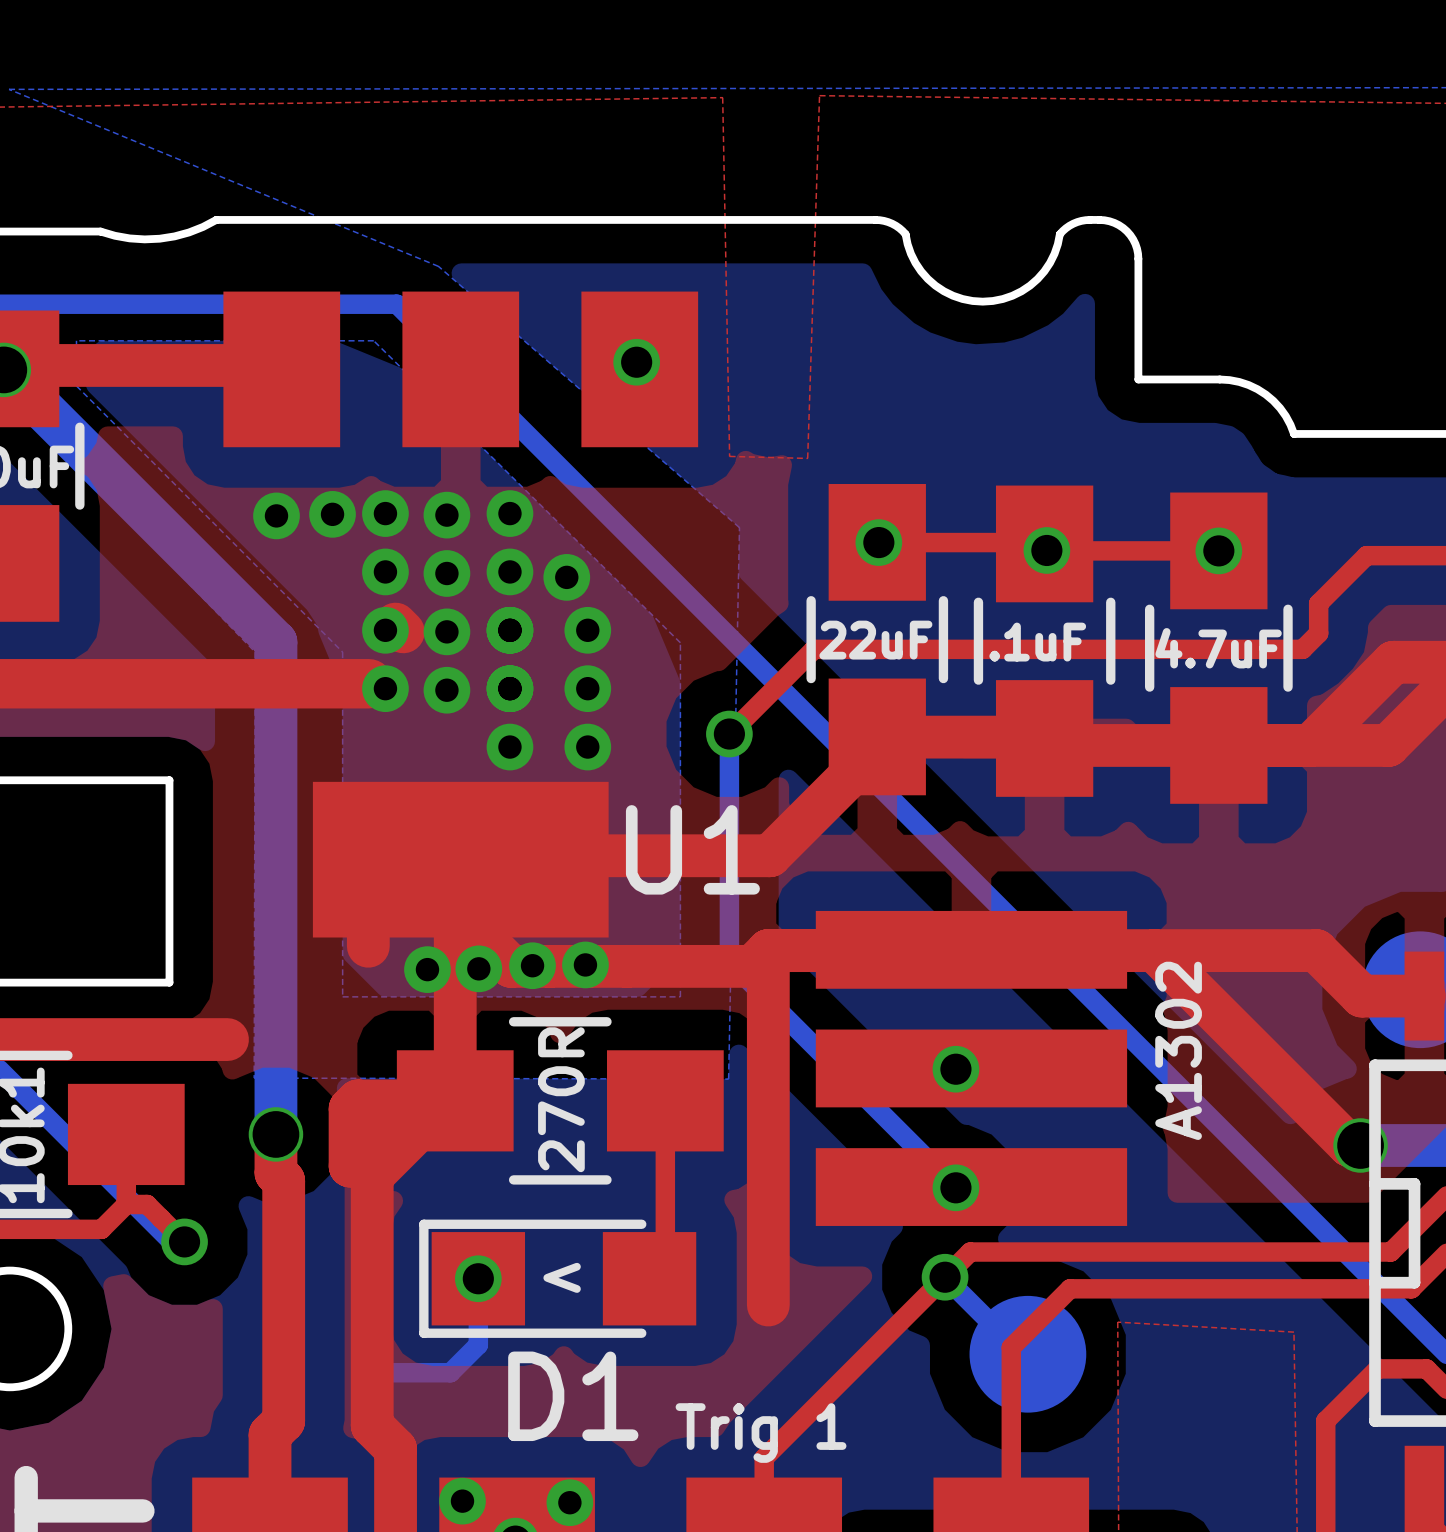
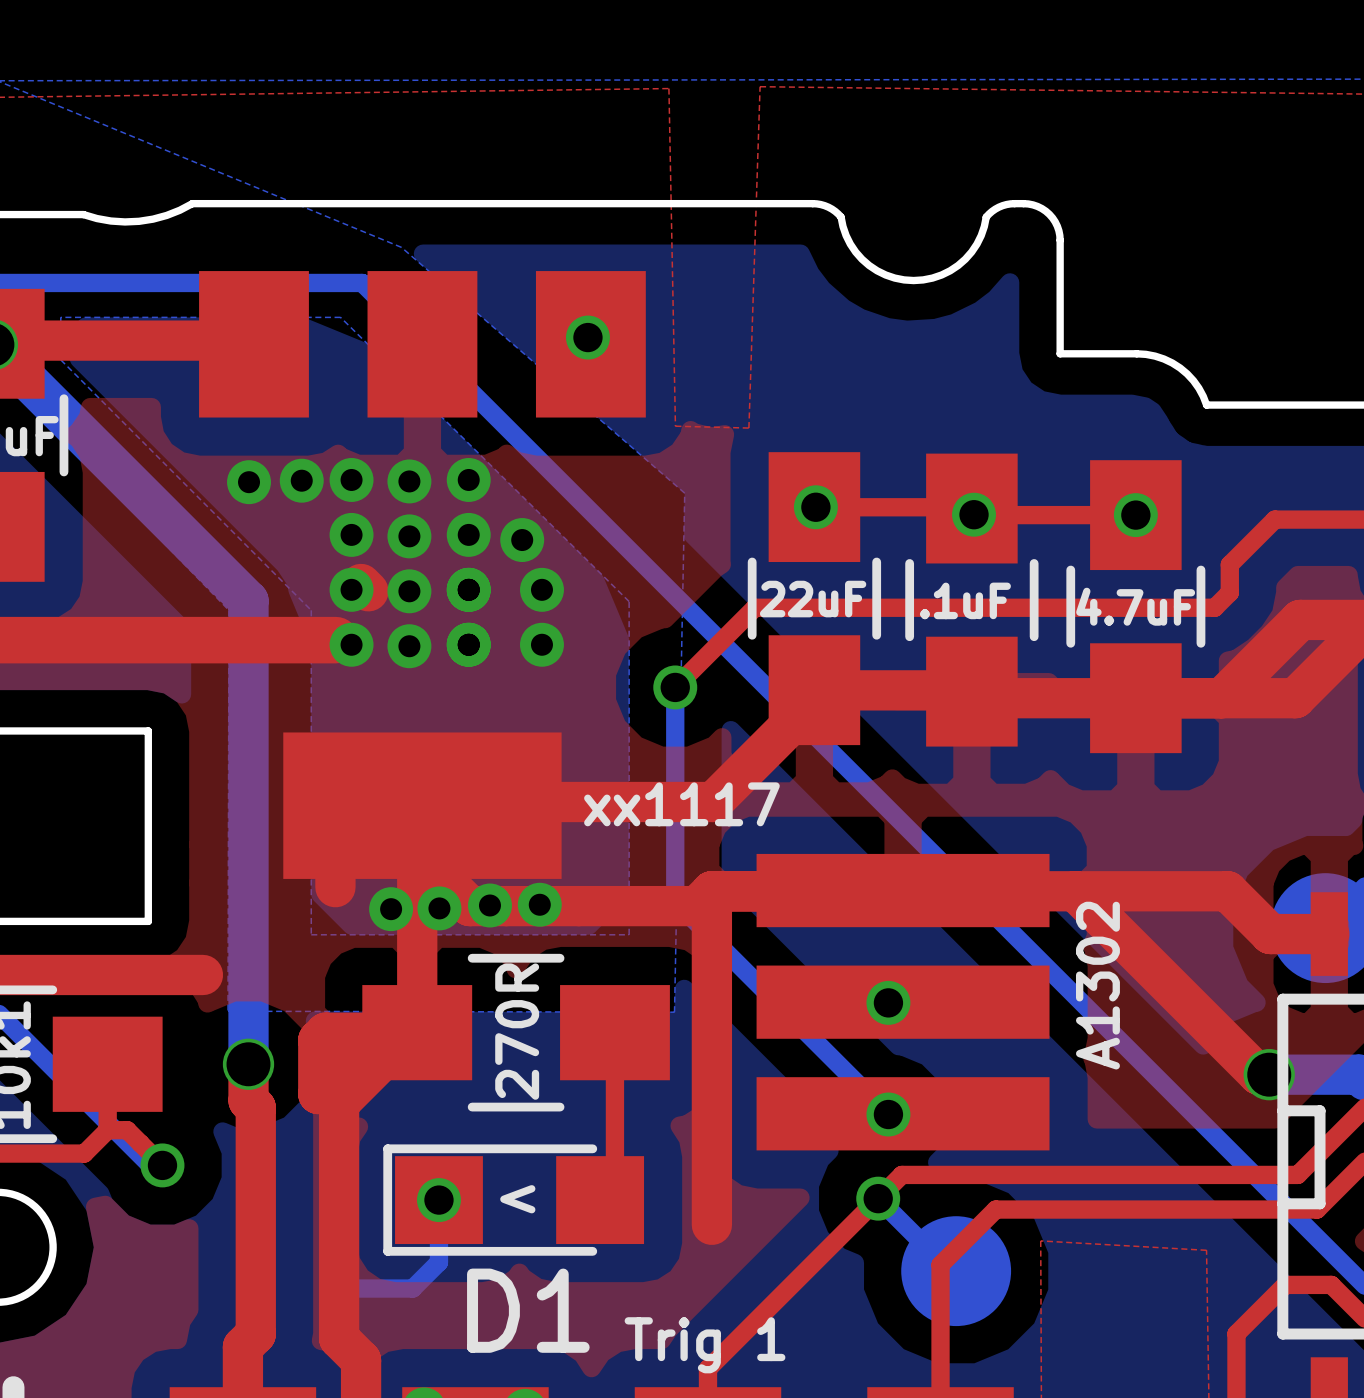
part: (509, 747) -> none
part: (587, 747) -> none
U1 name: U1 (692, 849) -> xx1117 (681, 804)

